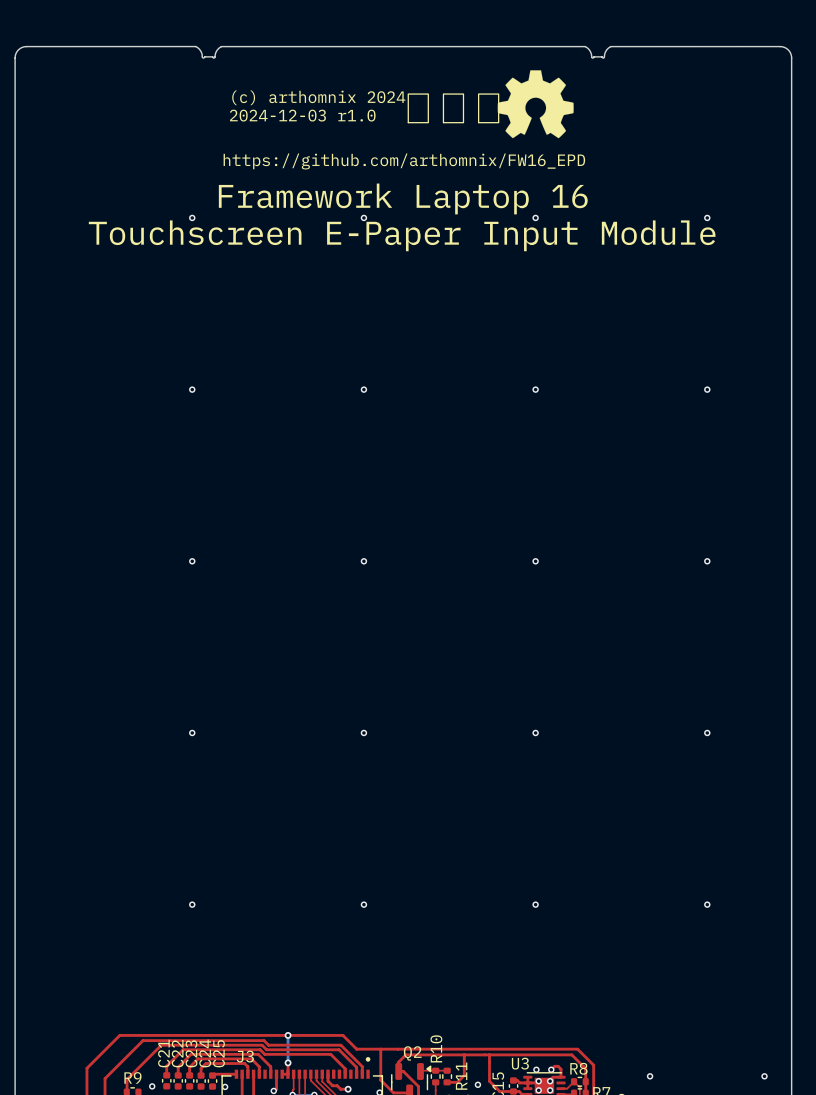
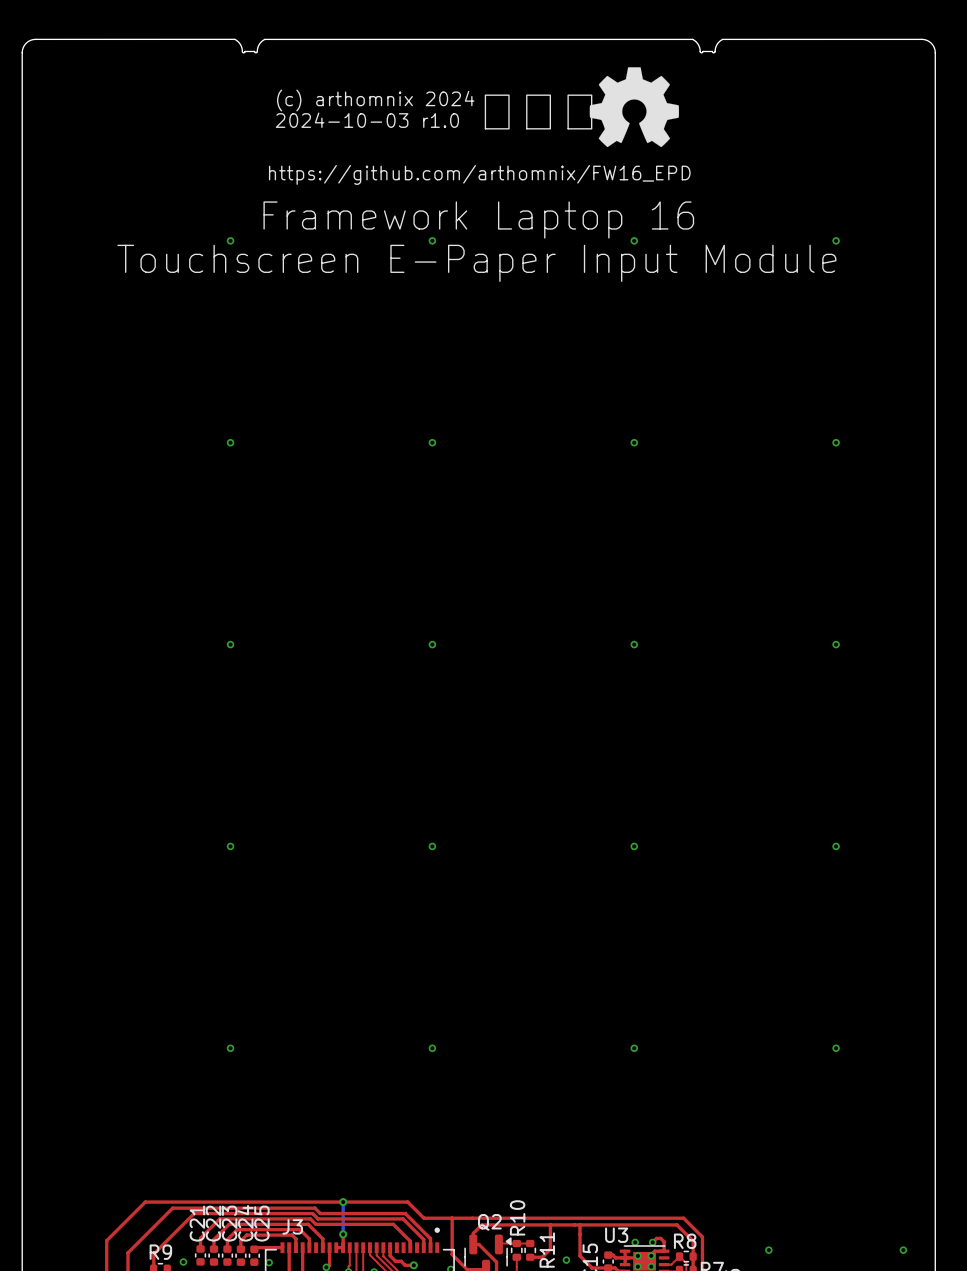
text: 2024-12-03 r1.0 (302, 115) -> 2024-10-03 r1.0 (367, 120)

